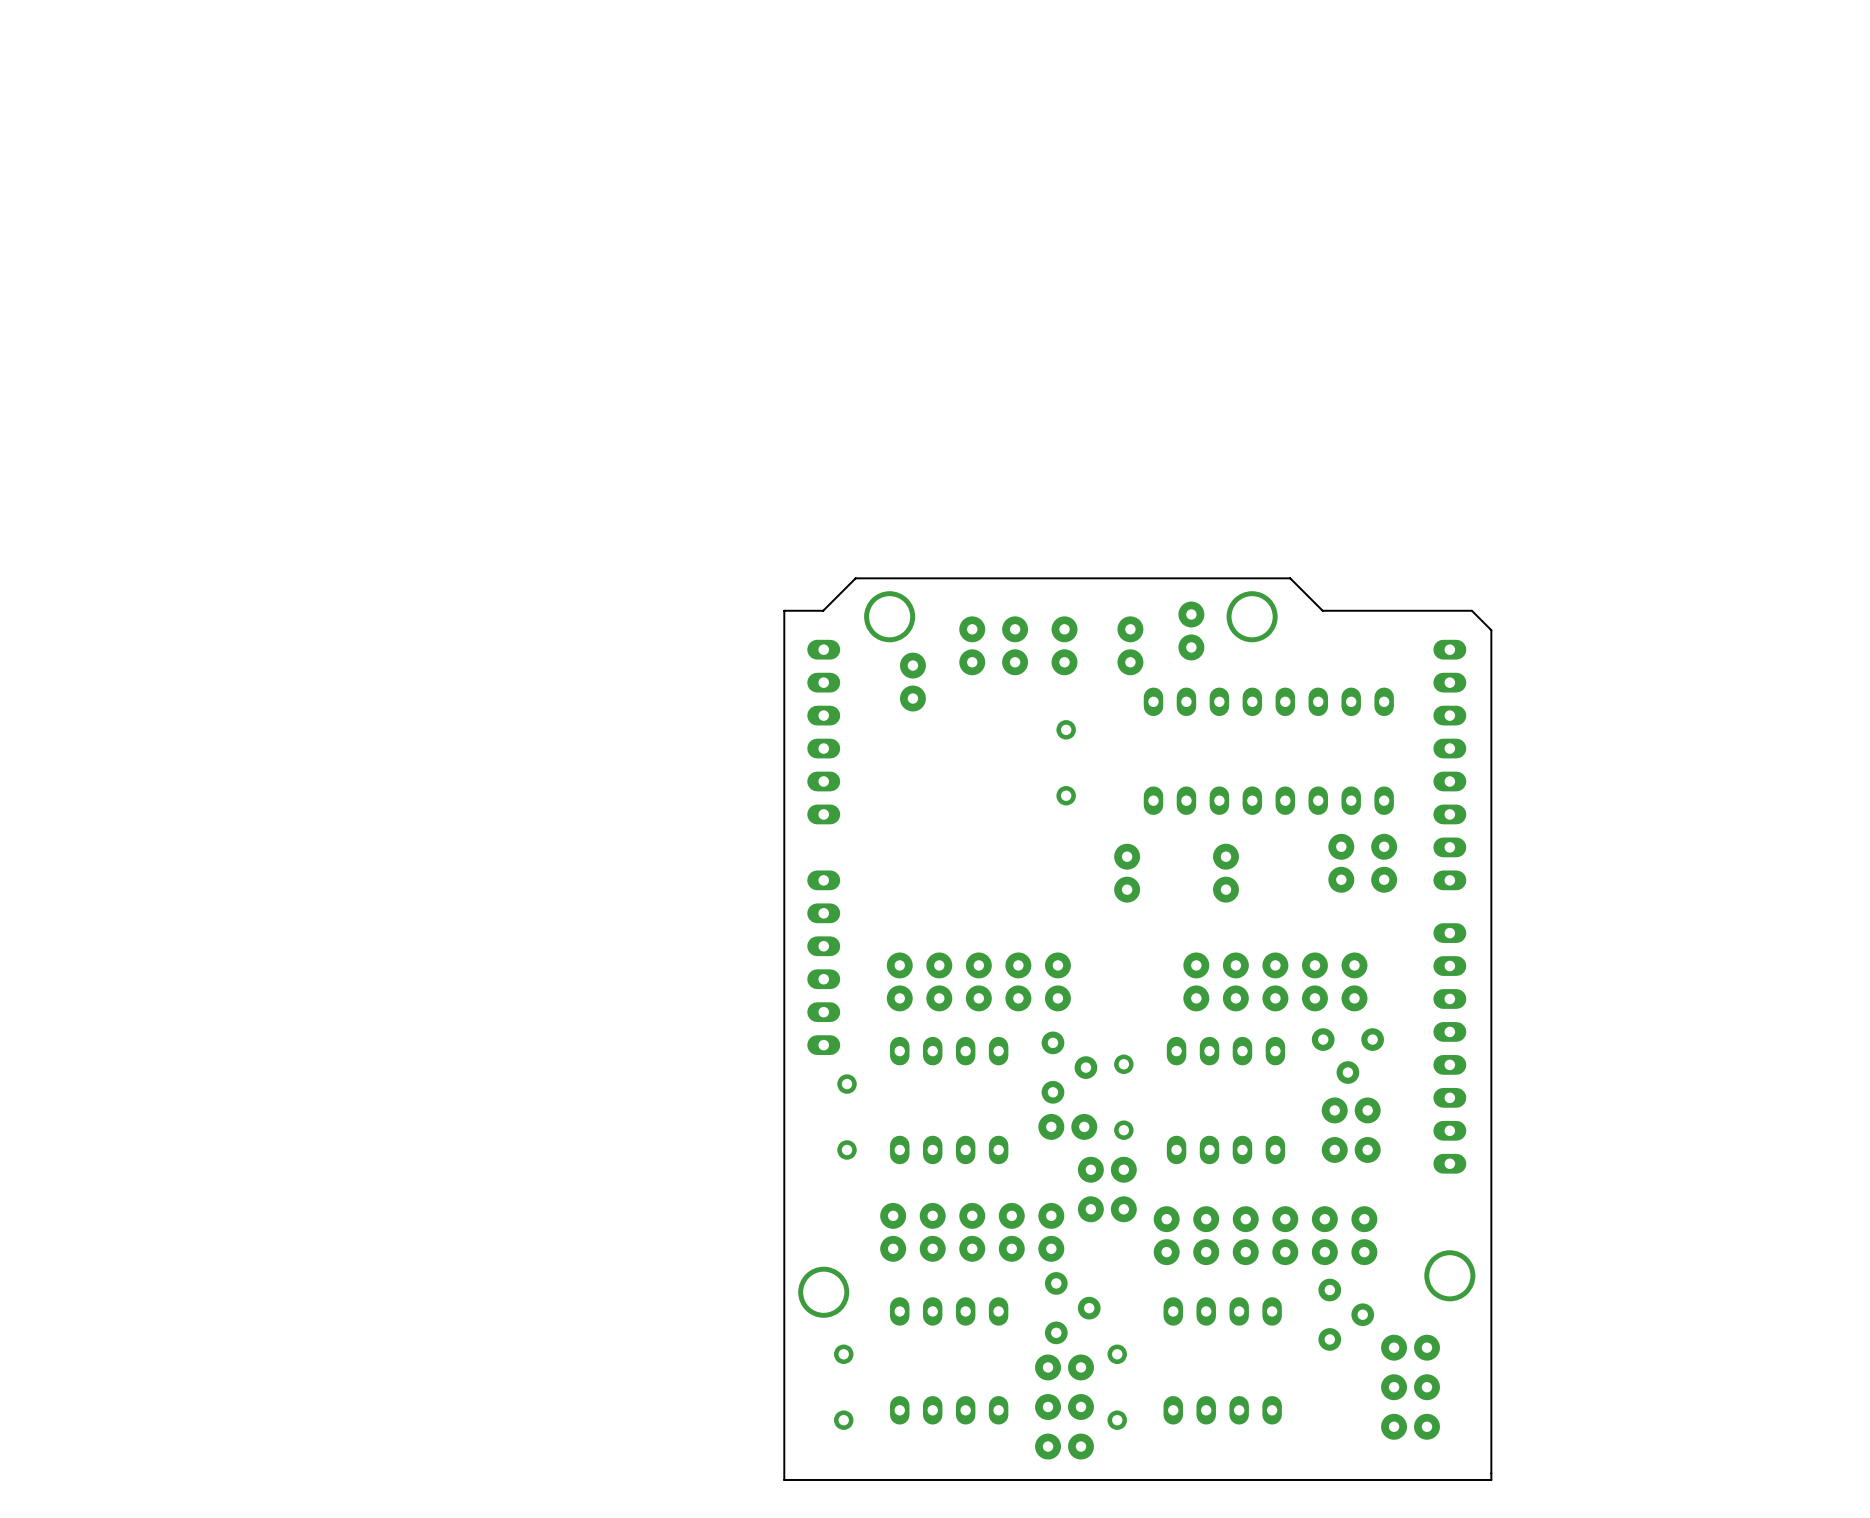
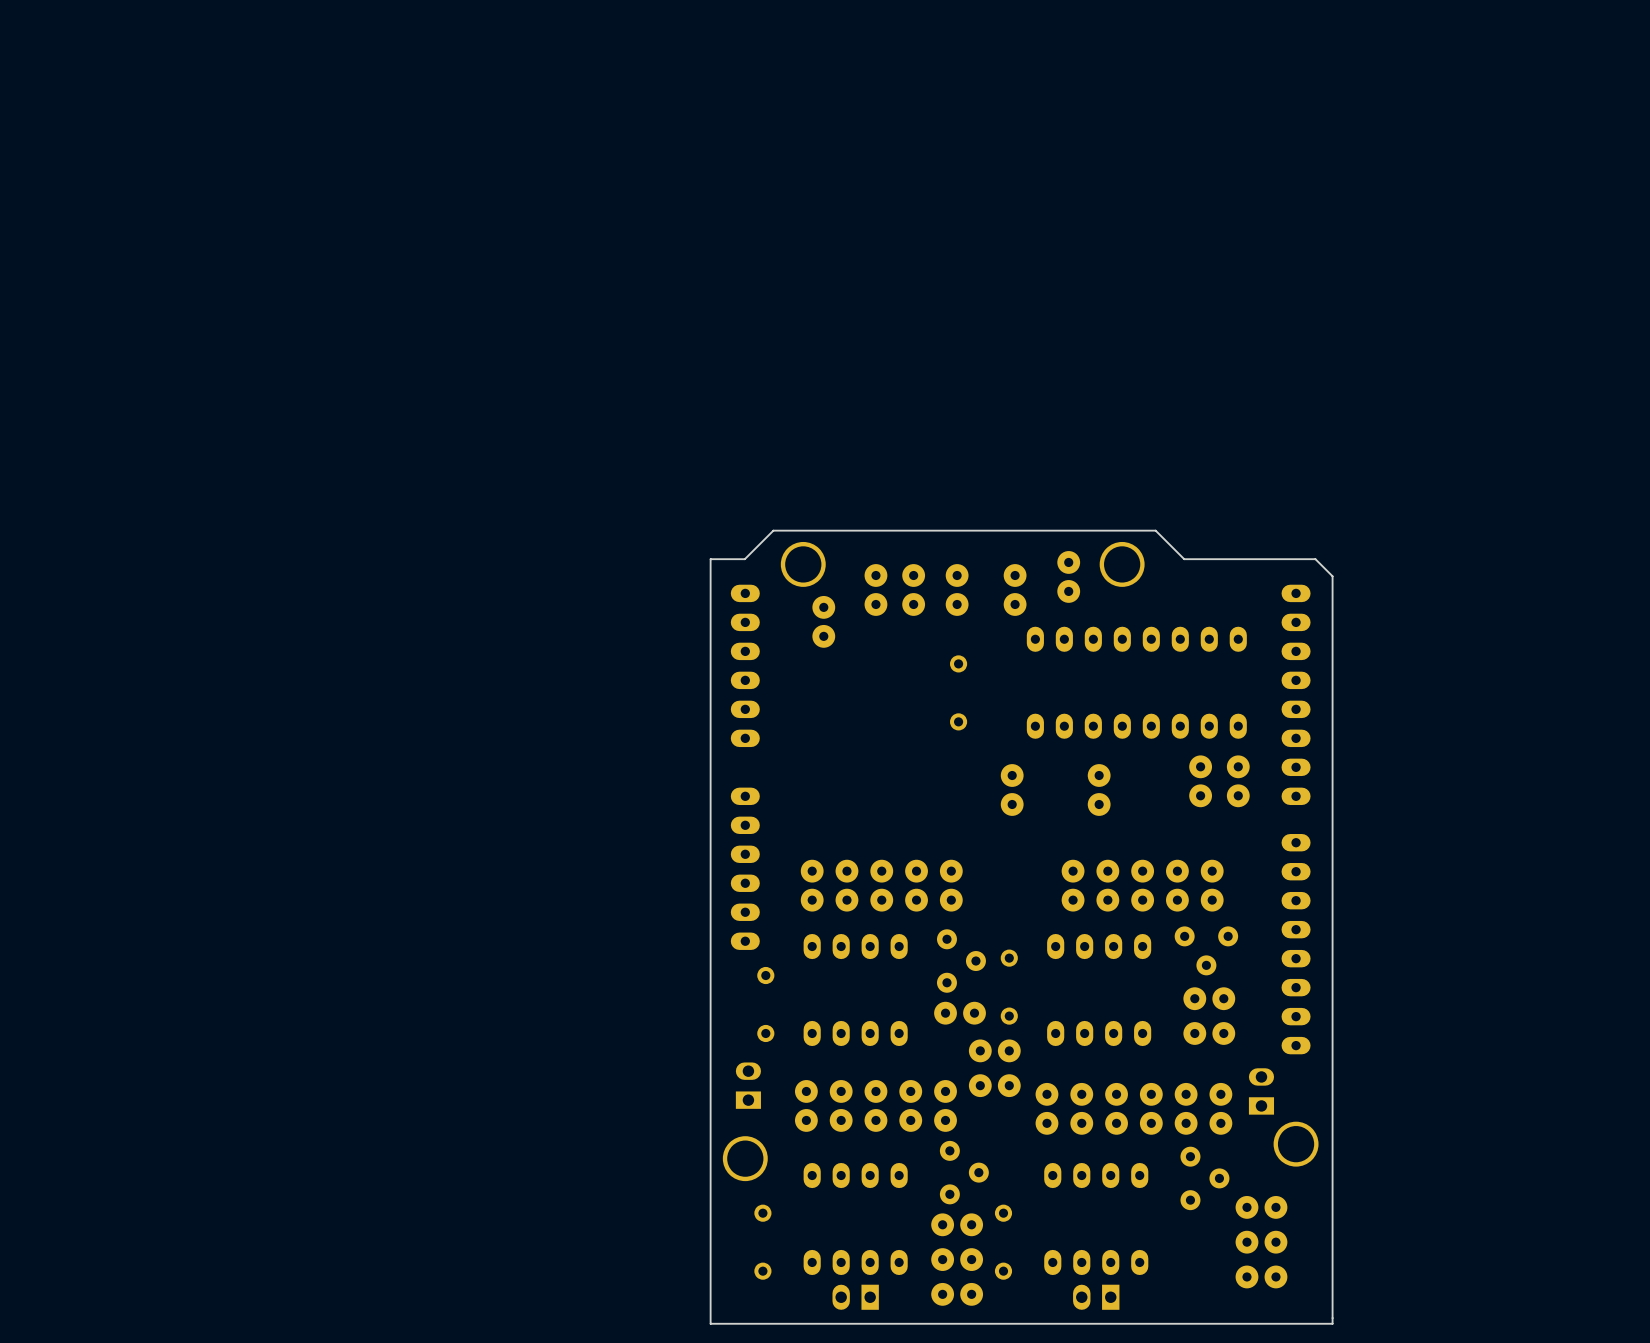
part: none -> (748, 1085)
part: none -> (1261, 1091)
part: none -> (855, 1297)
part: none -> (1096, 1297)

